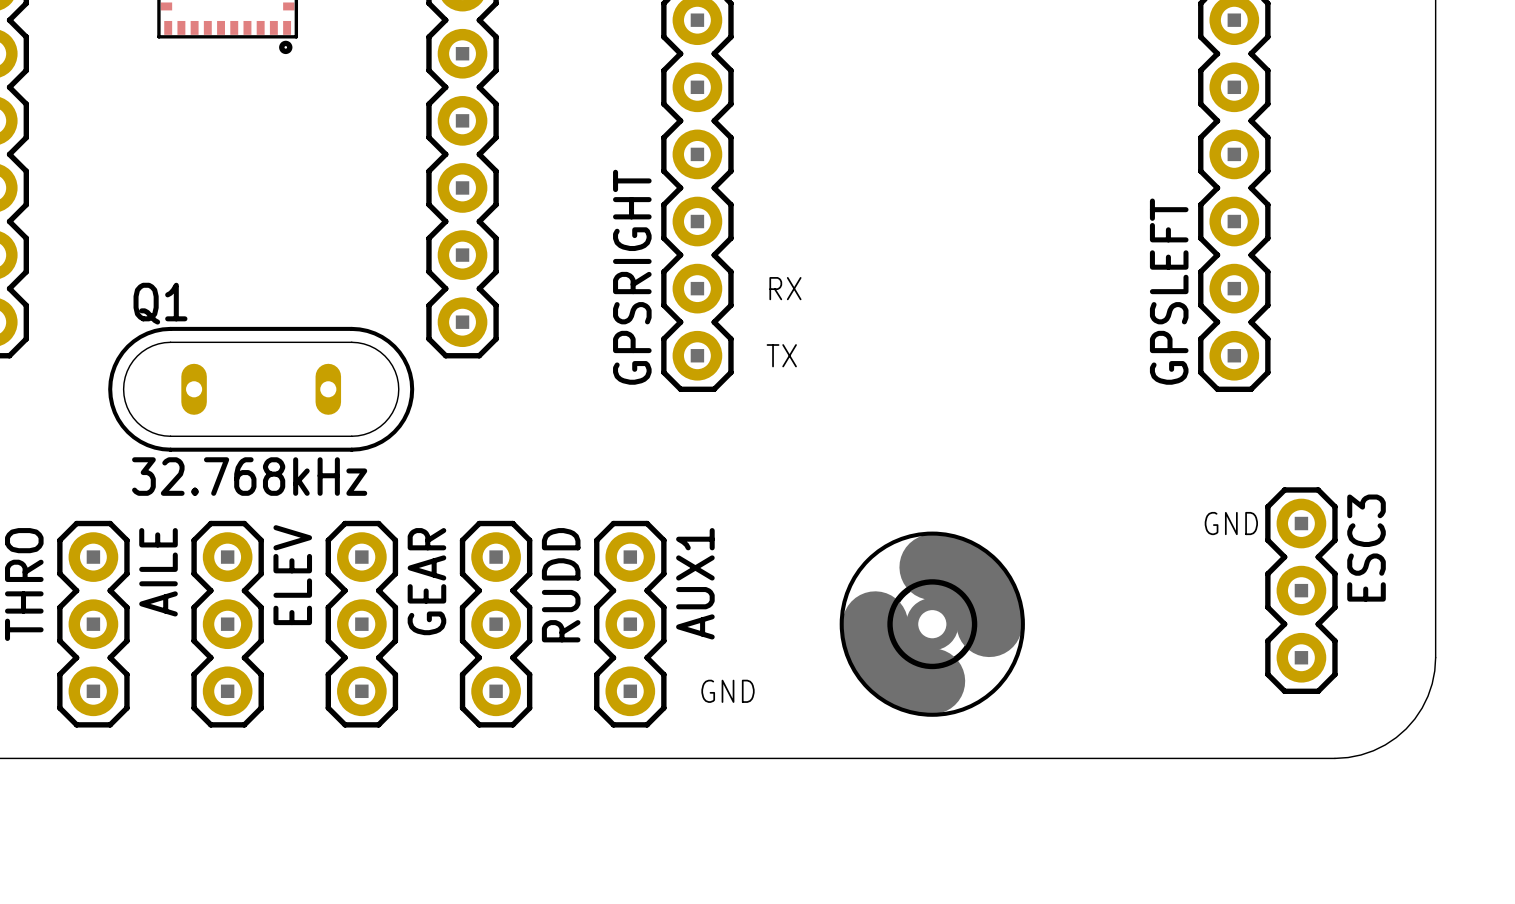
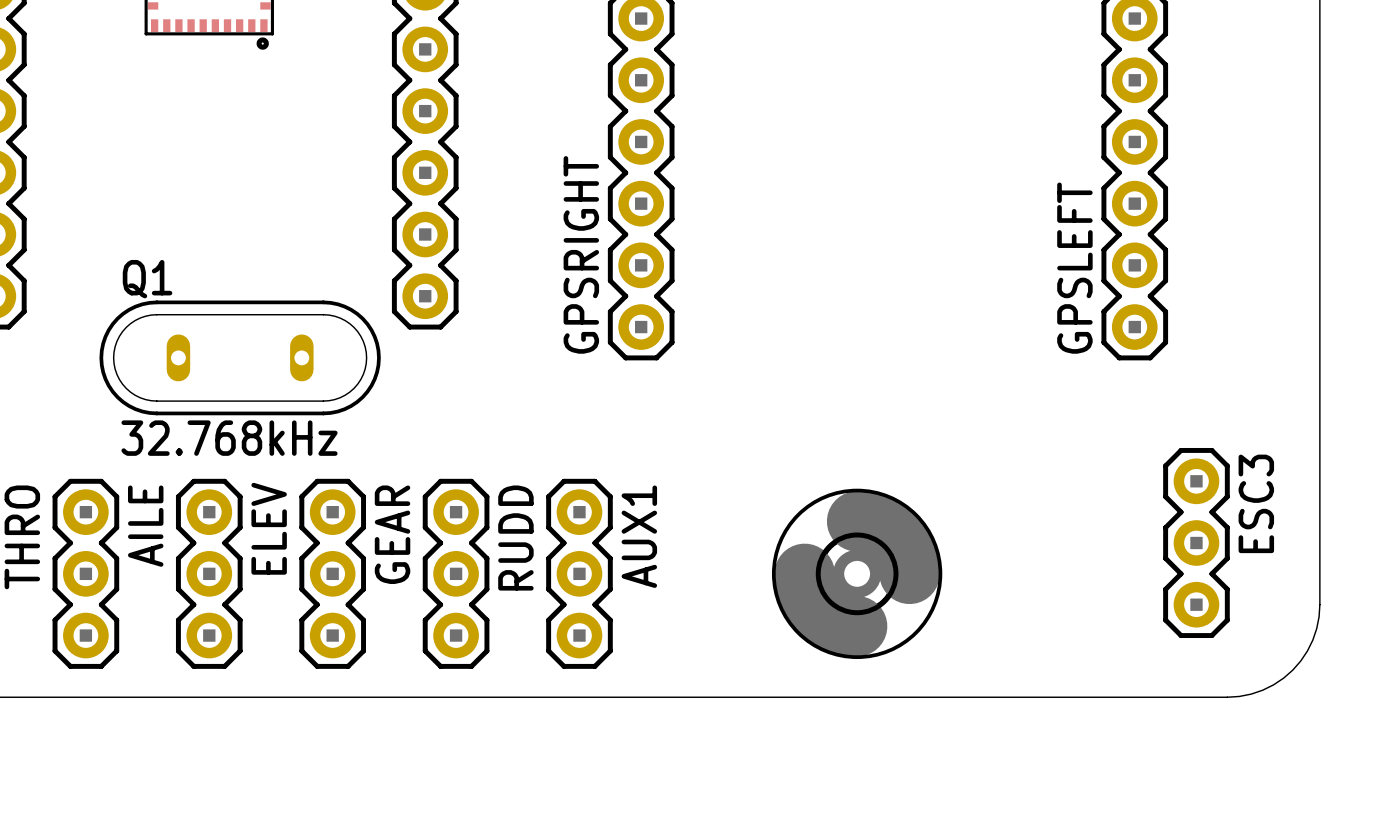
text: RX (785, 288) -> none
text: TX (781, 355) -> none
text: GND (1231, 523) -> none
text: GND (728, 691) -> none

